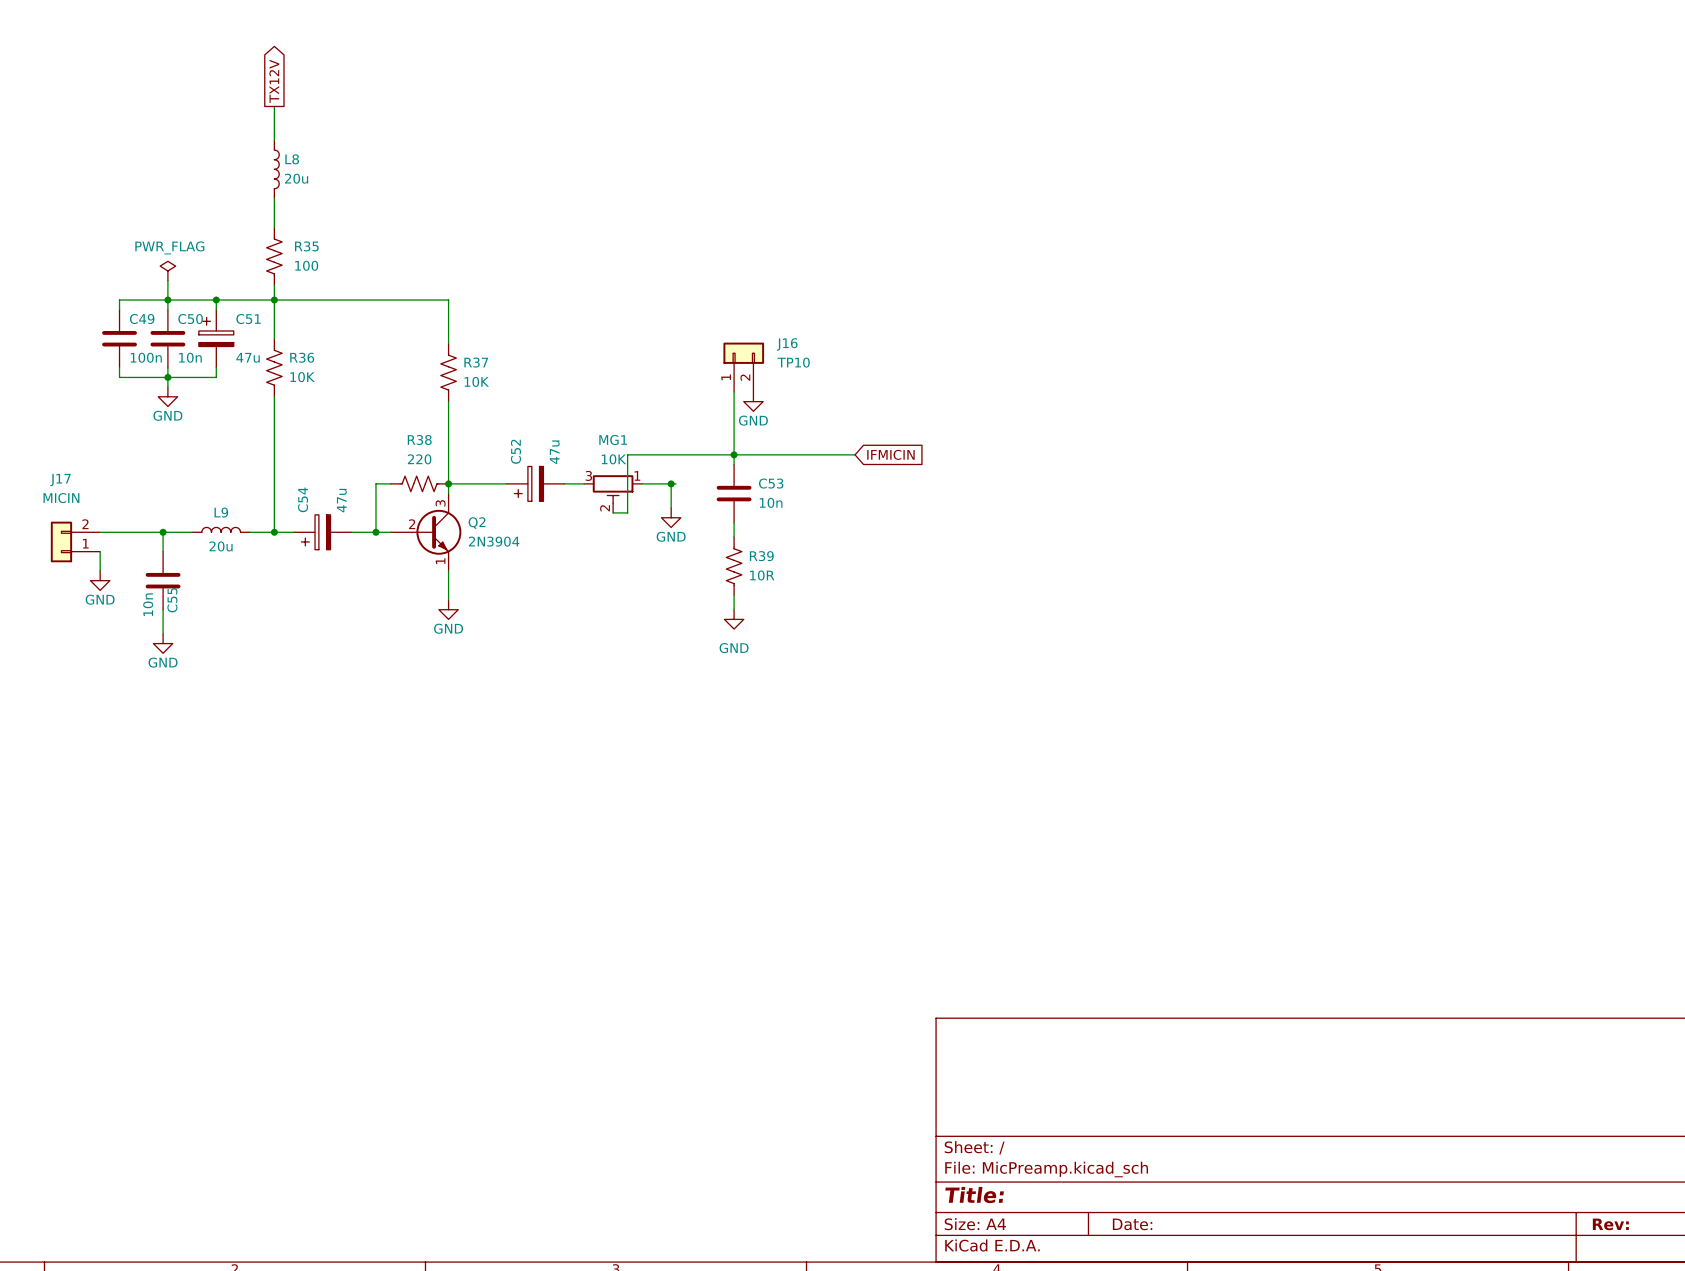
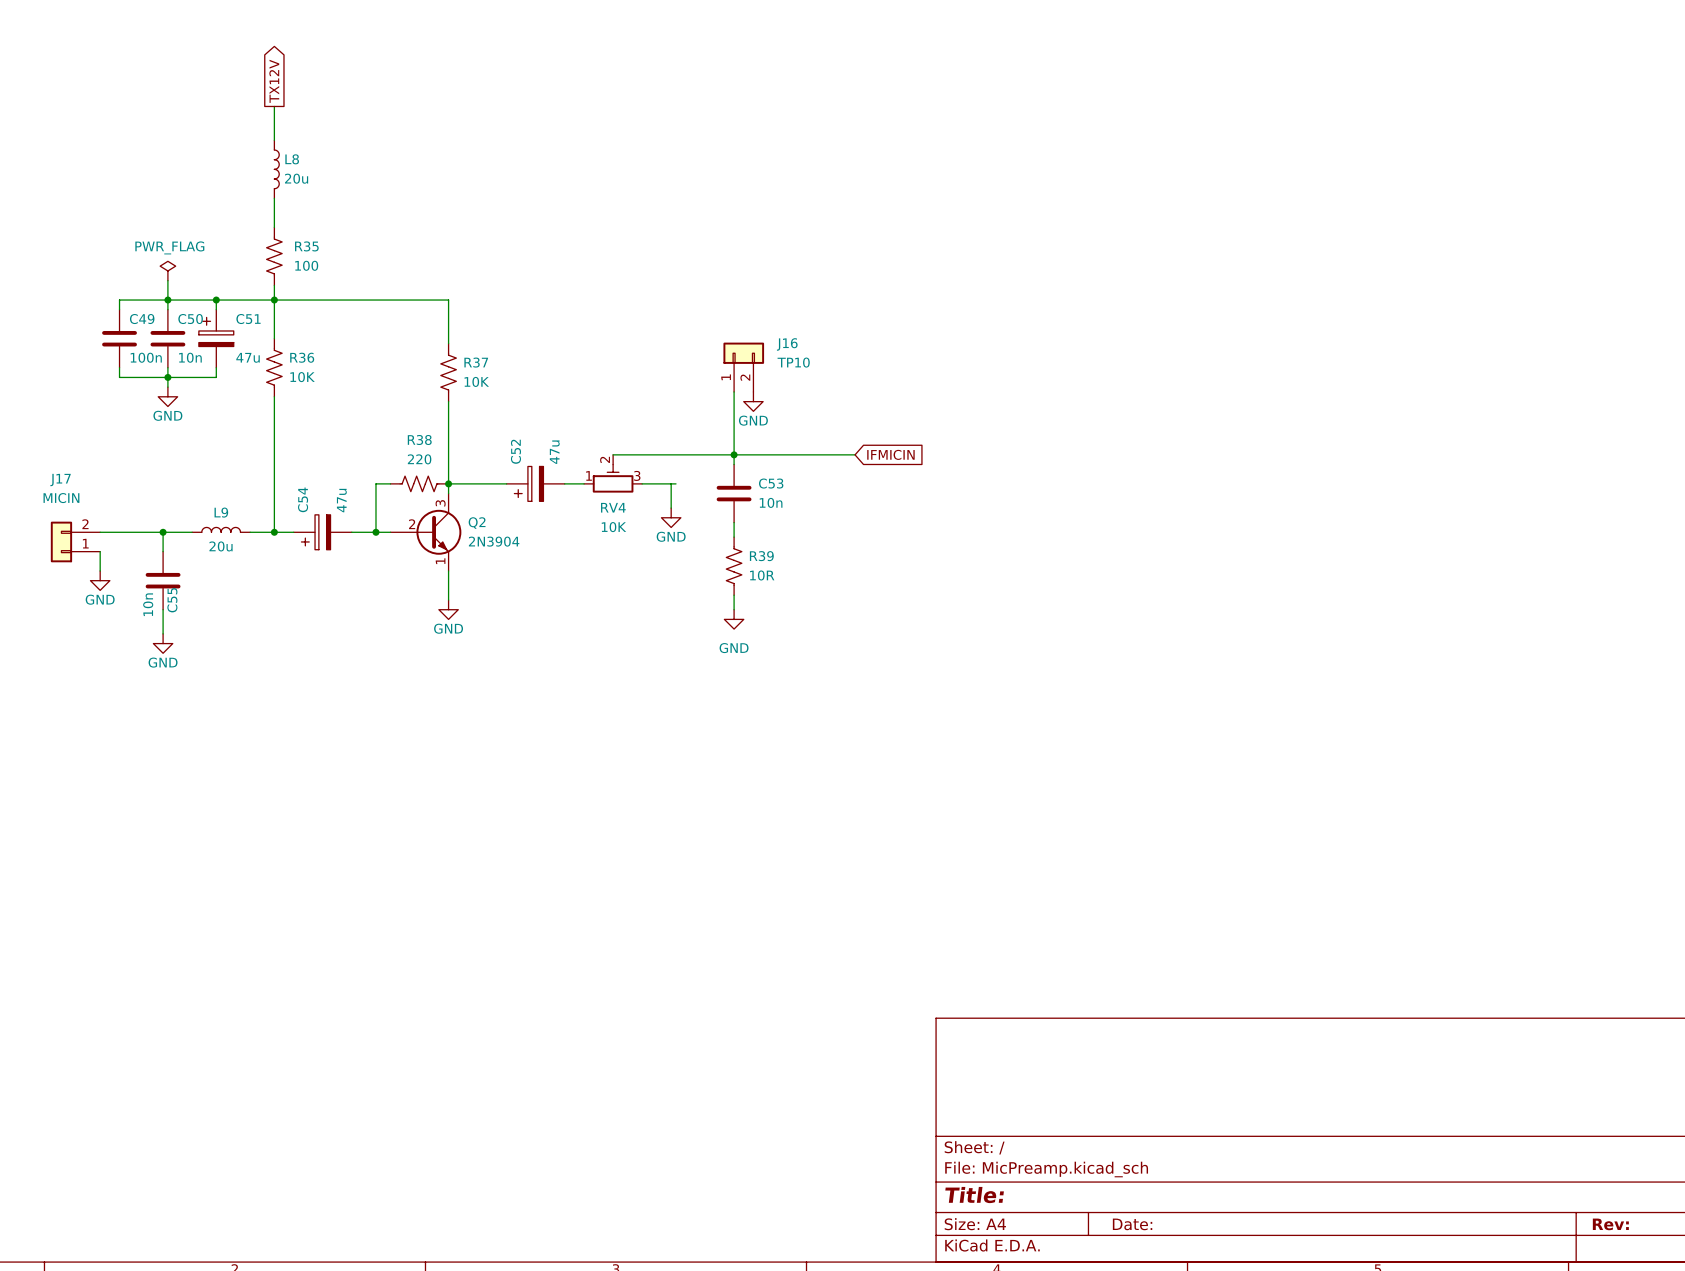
wire: (627, 454) (627, 512) (613, 512) -> (627, 454) (613, 454)
RV4: none -> 10K (613, 473)
junction: (671, 483) -> none
MG1: 10K (613, 494) -> none

